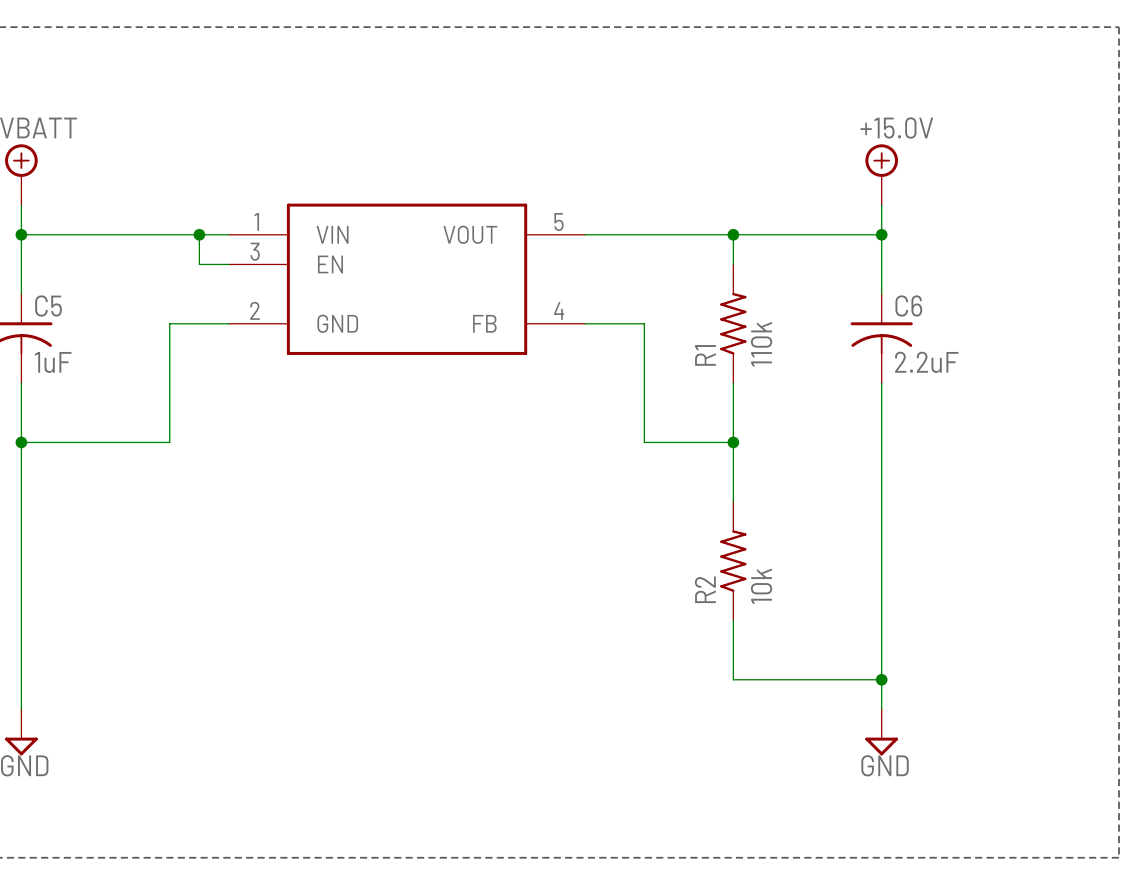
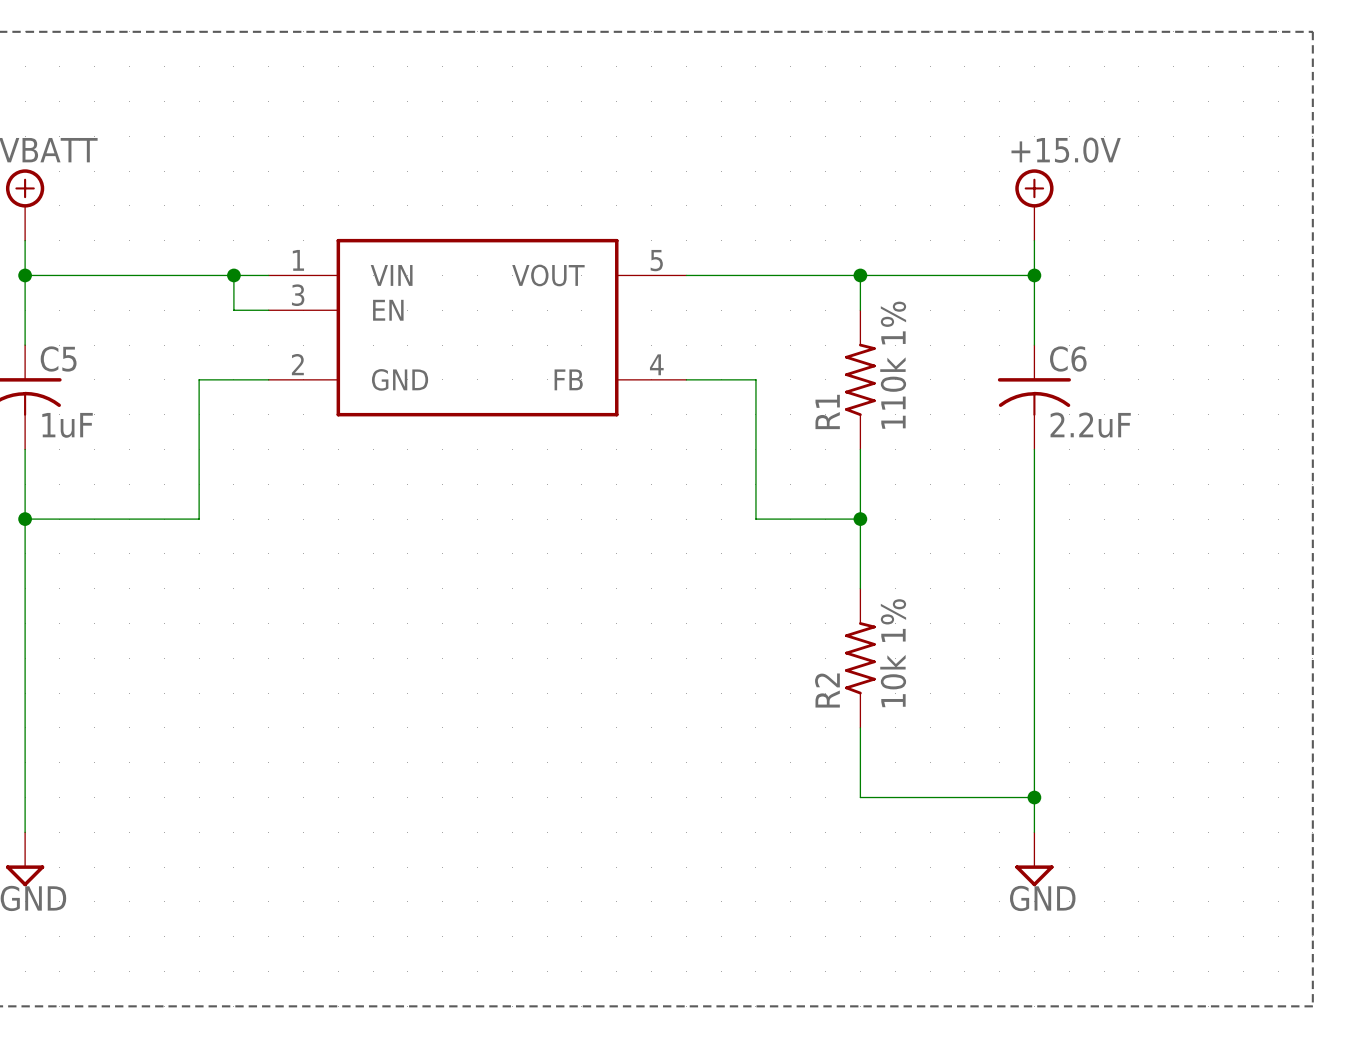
R1 value: 110k (761, 344) -> 110k 1% (893, 365)
R2 value: 10k (761, 586) -> 10k 1% (893, 653)

